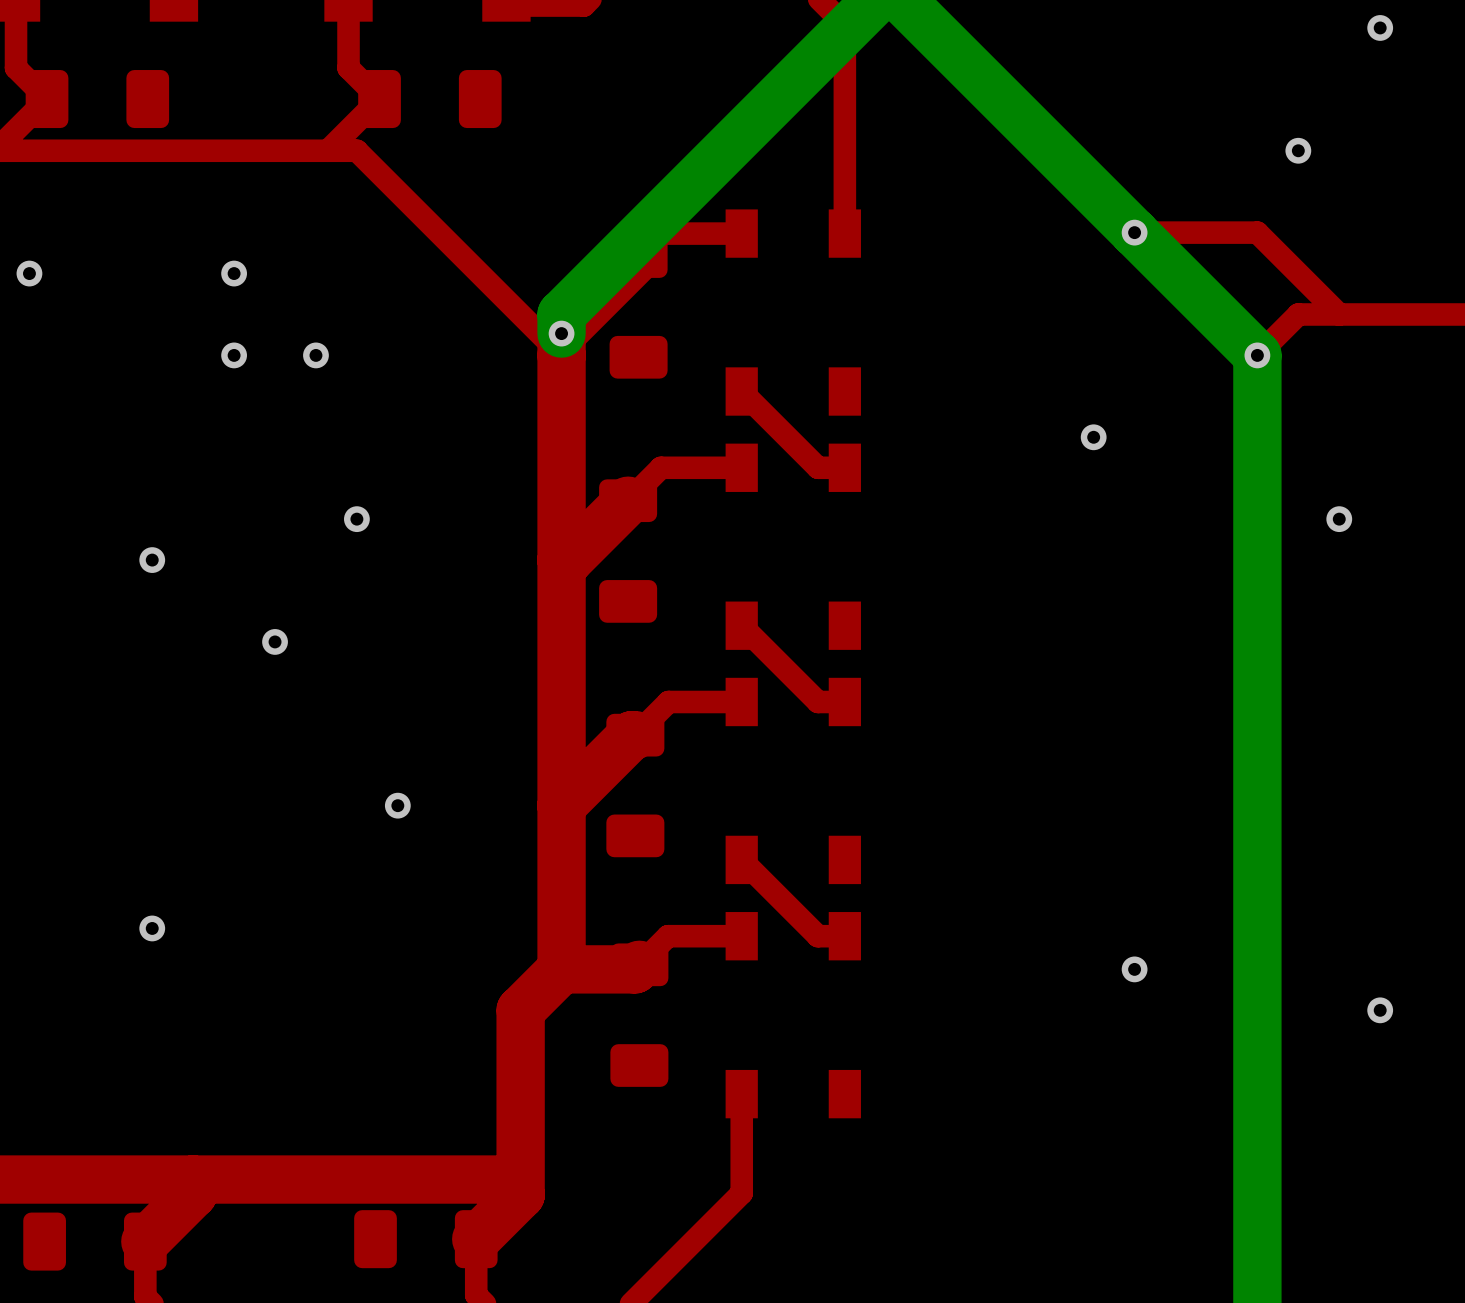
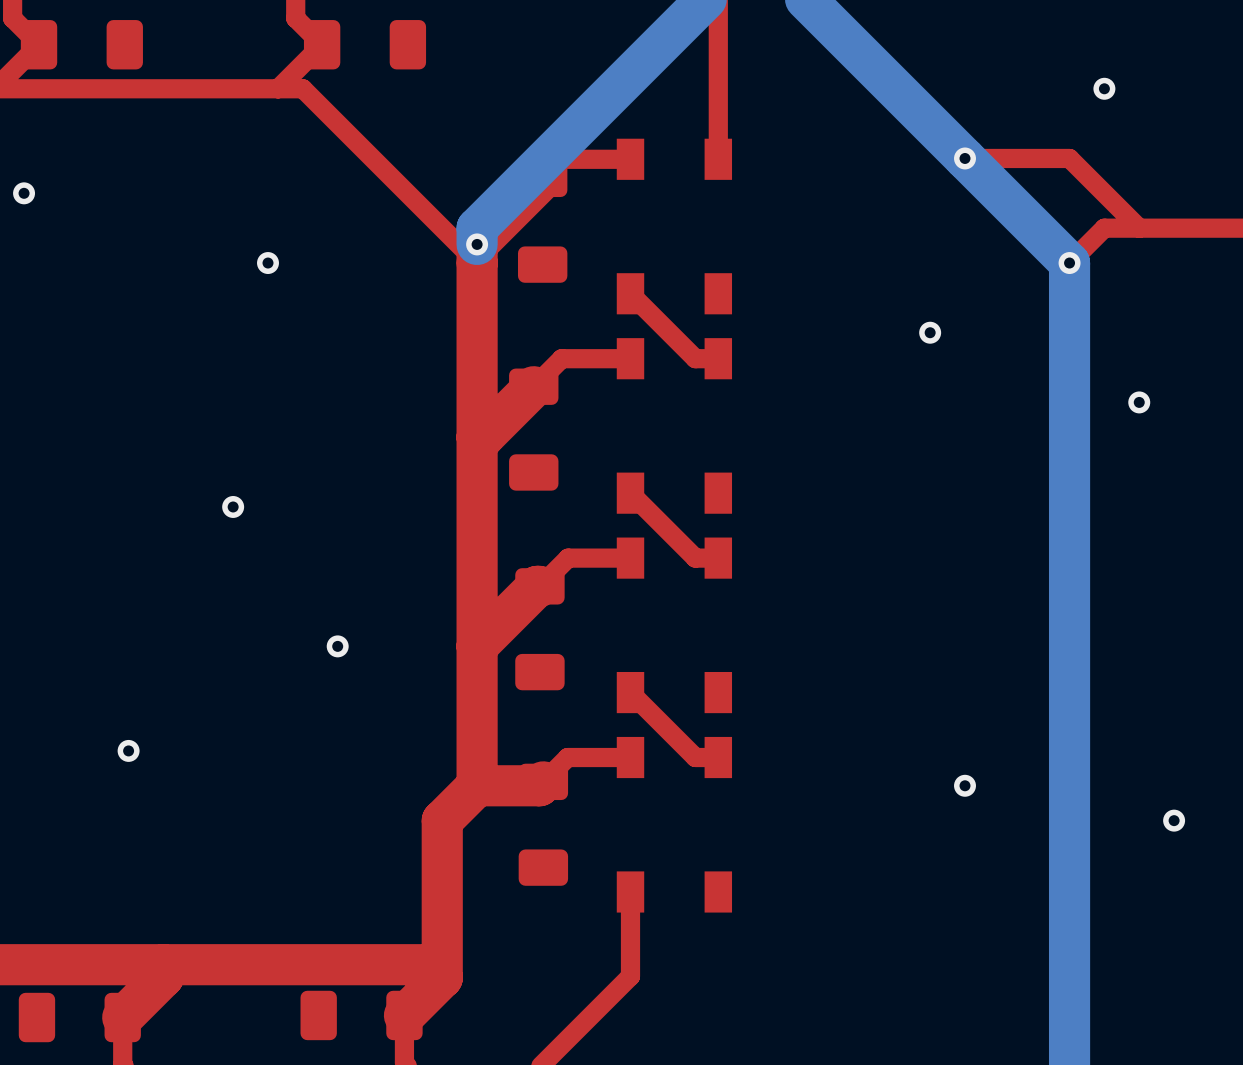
via: (234, 273) -> none
via: (234, 355) -> none
via: (356, 519) -> none
via: (152, 560) -> none

